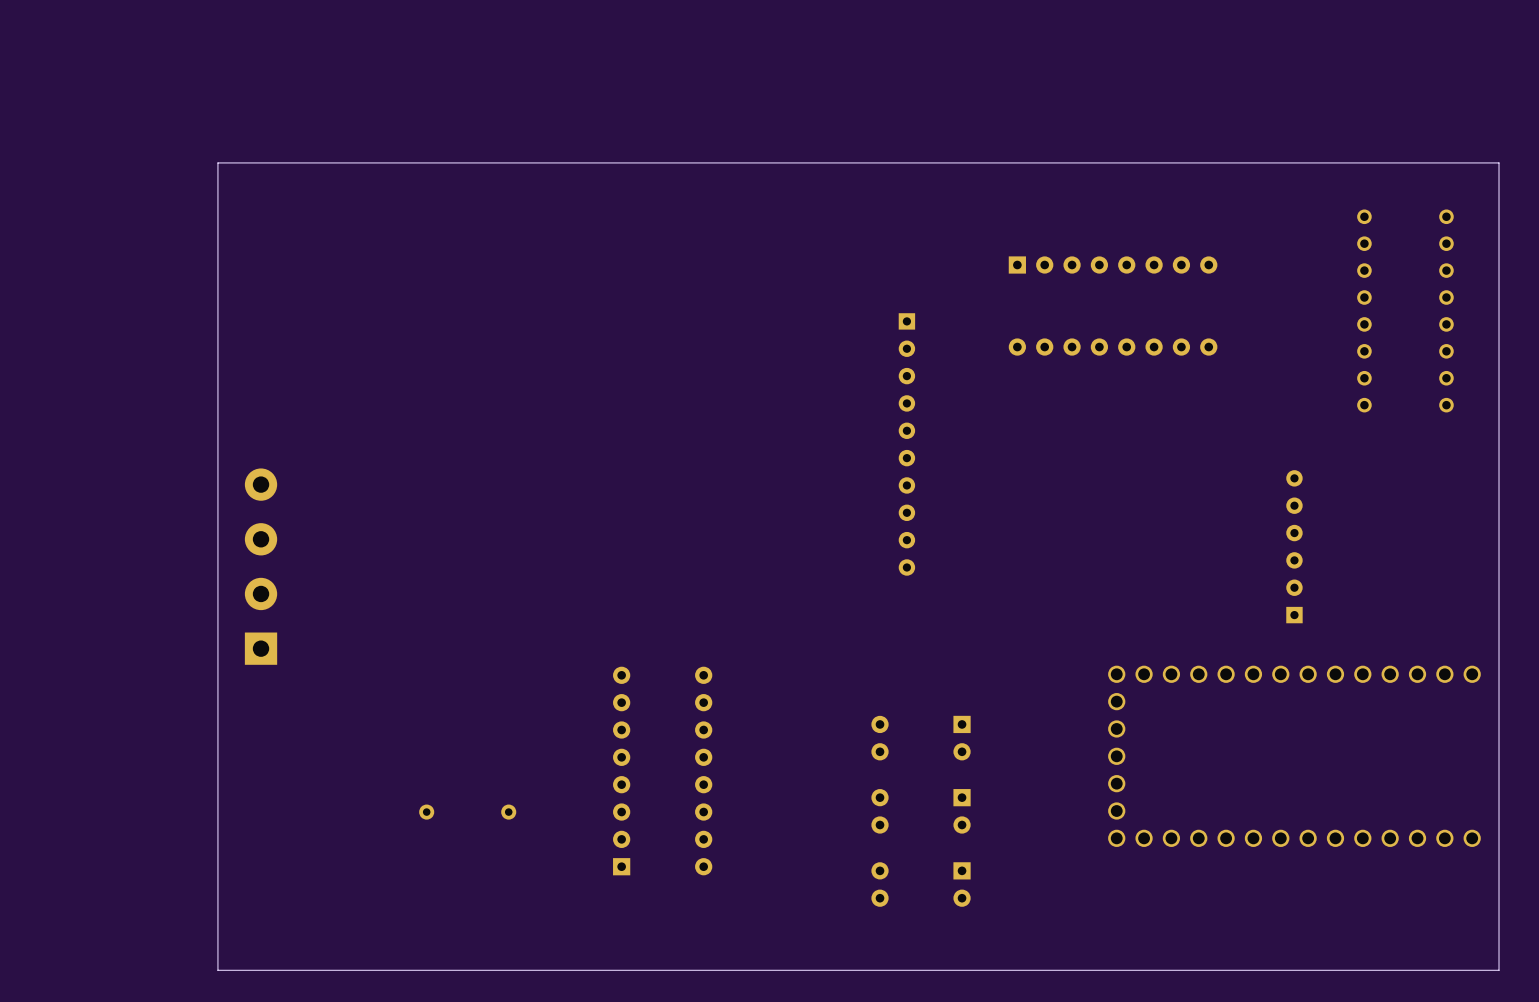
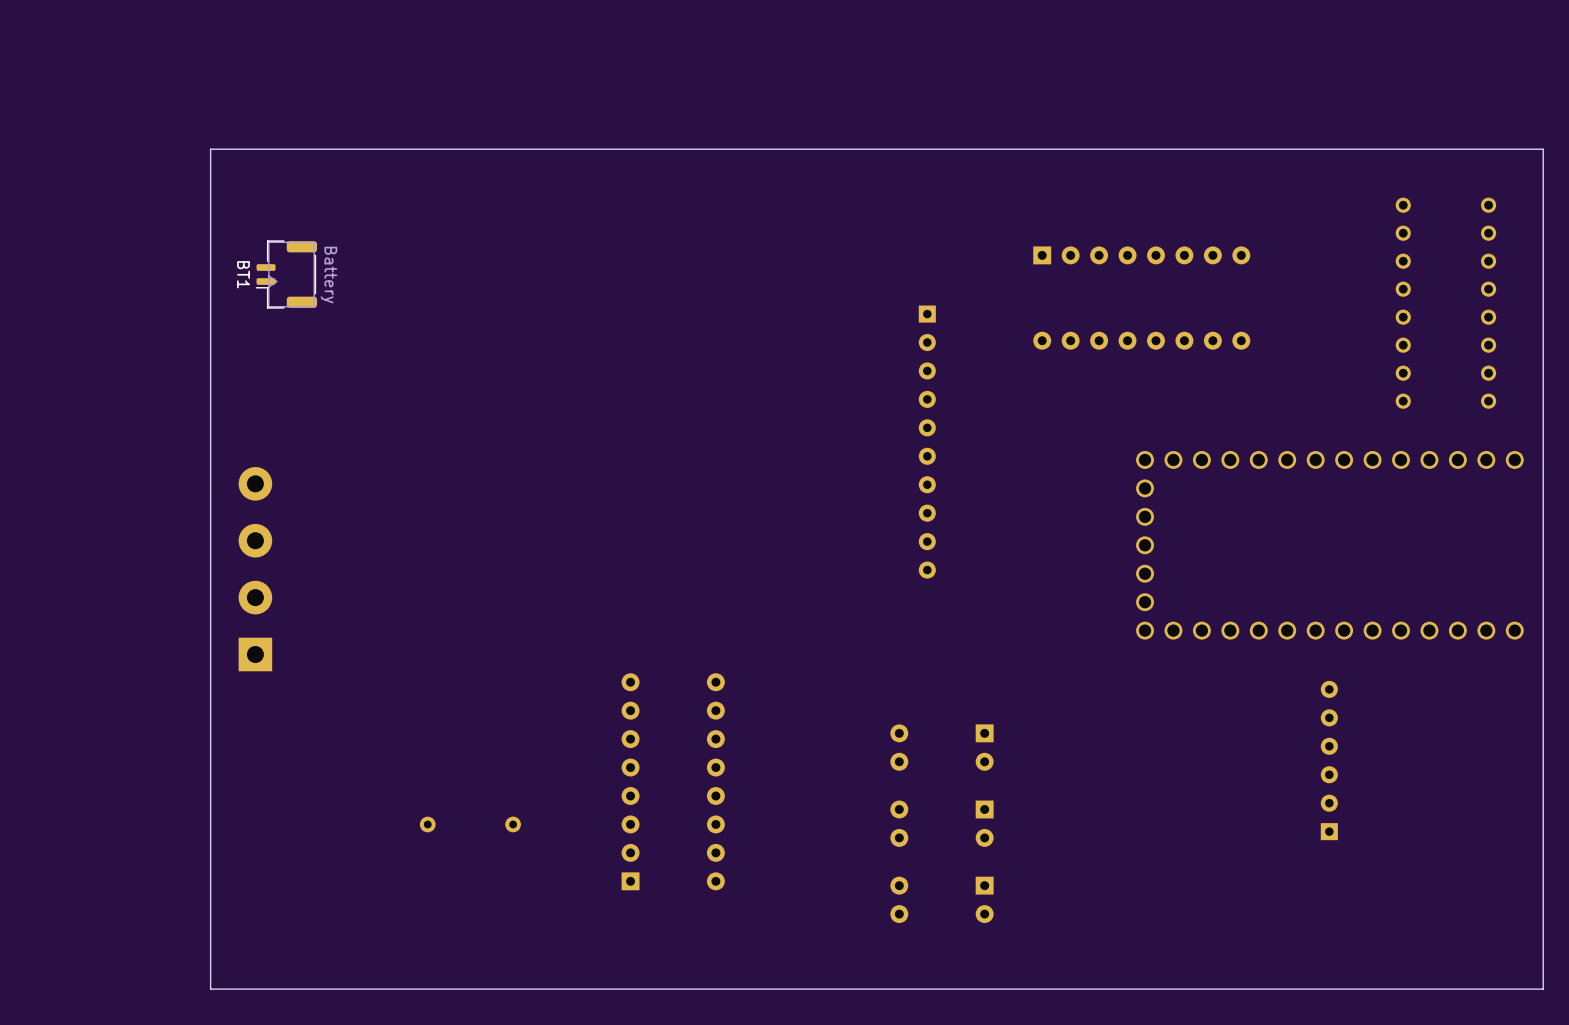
BT1: none -> Battery (286, 274)
part footprint: [1286, 470, 1303, 624] -> [1136, 450, 1524, 640]
part footprint: [1108, 665, 1481, 847] -> [1320, 680, 1338, 841]

